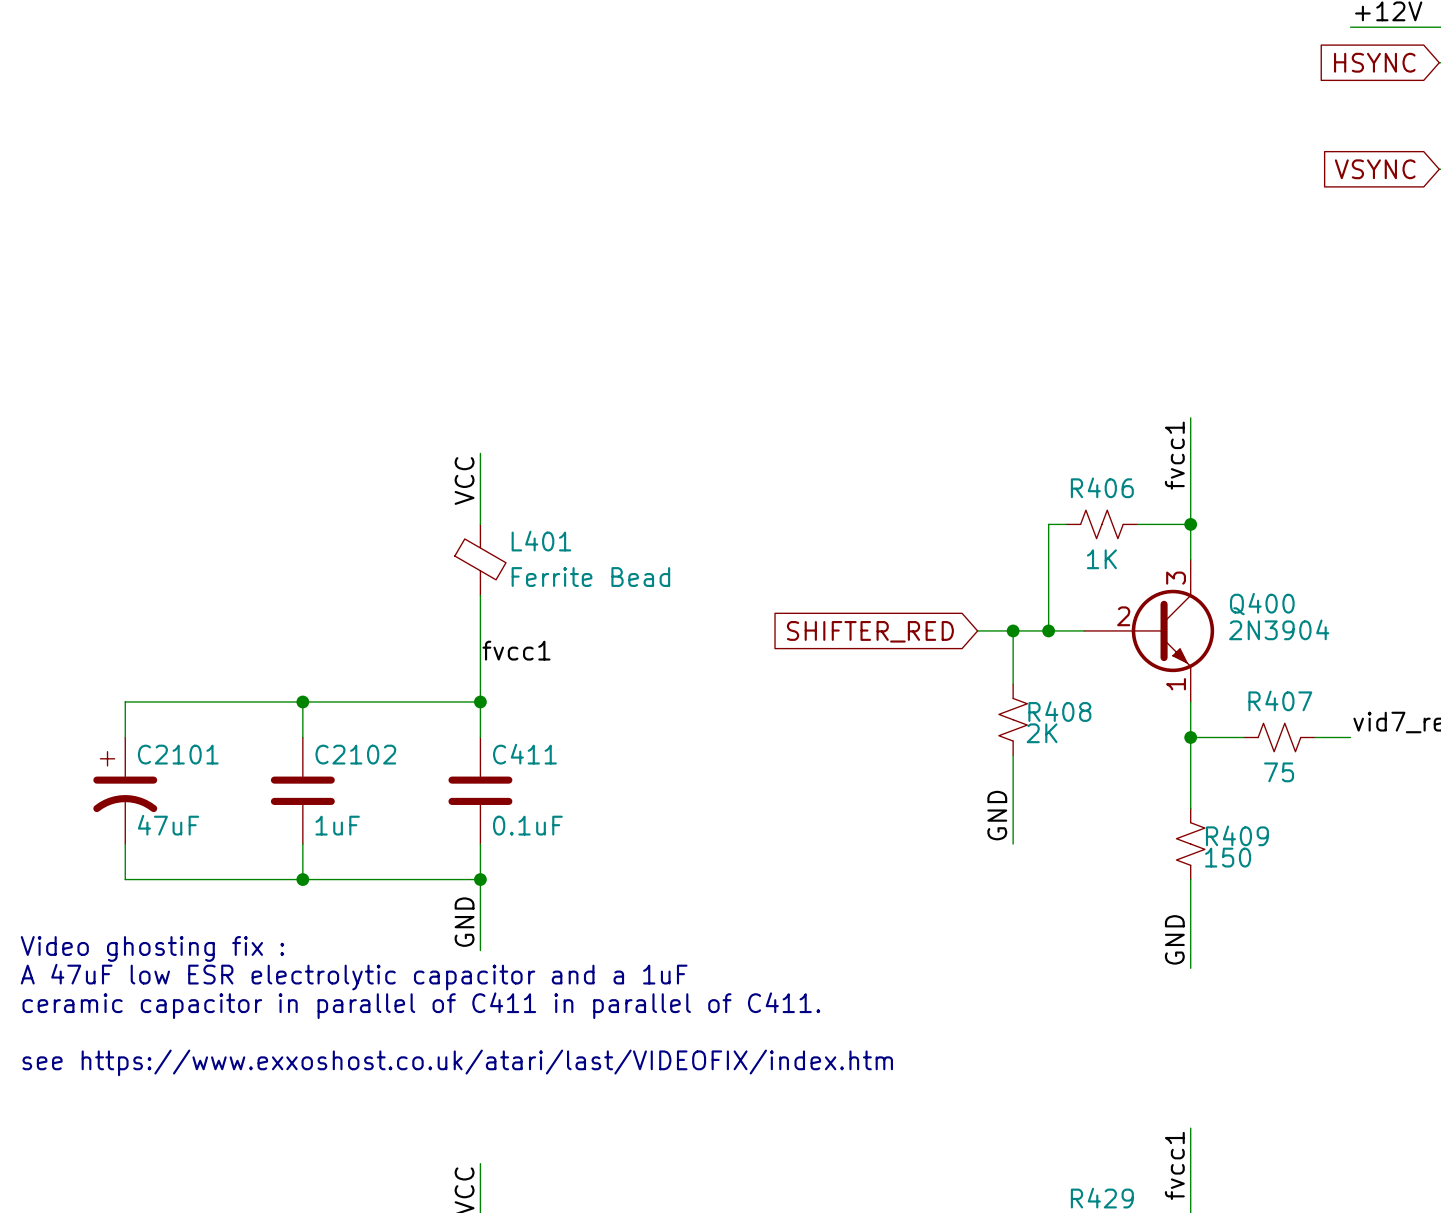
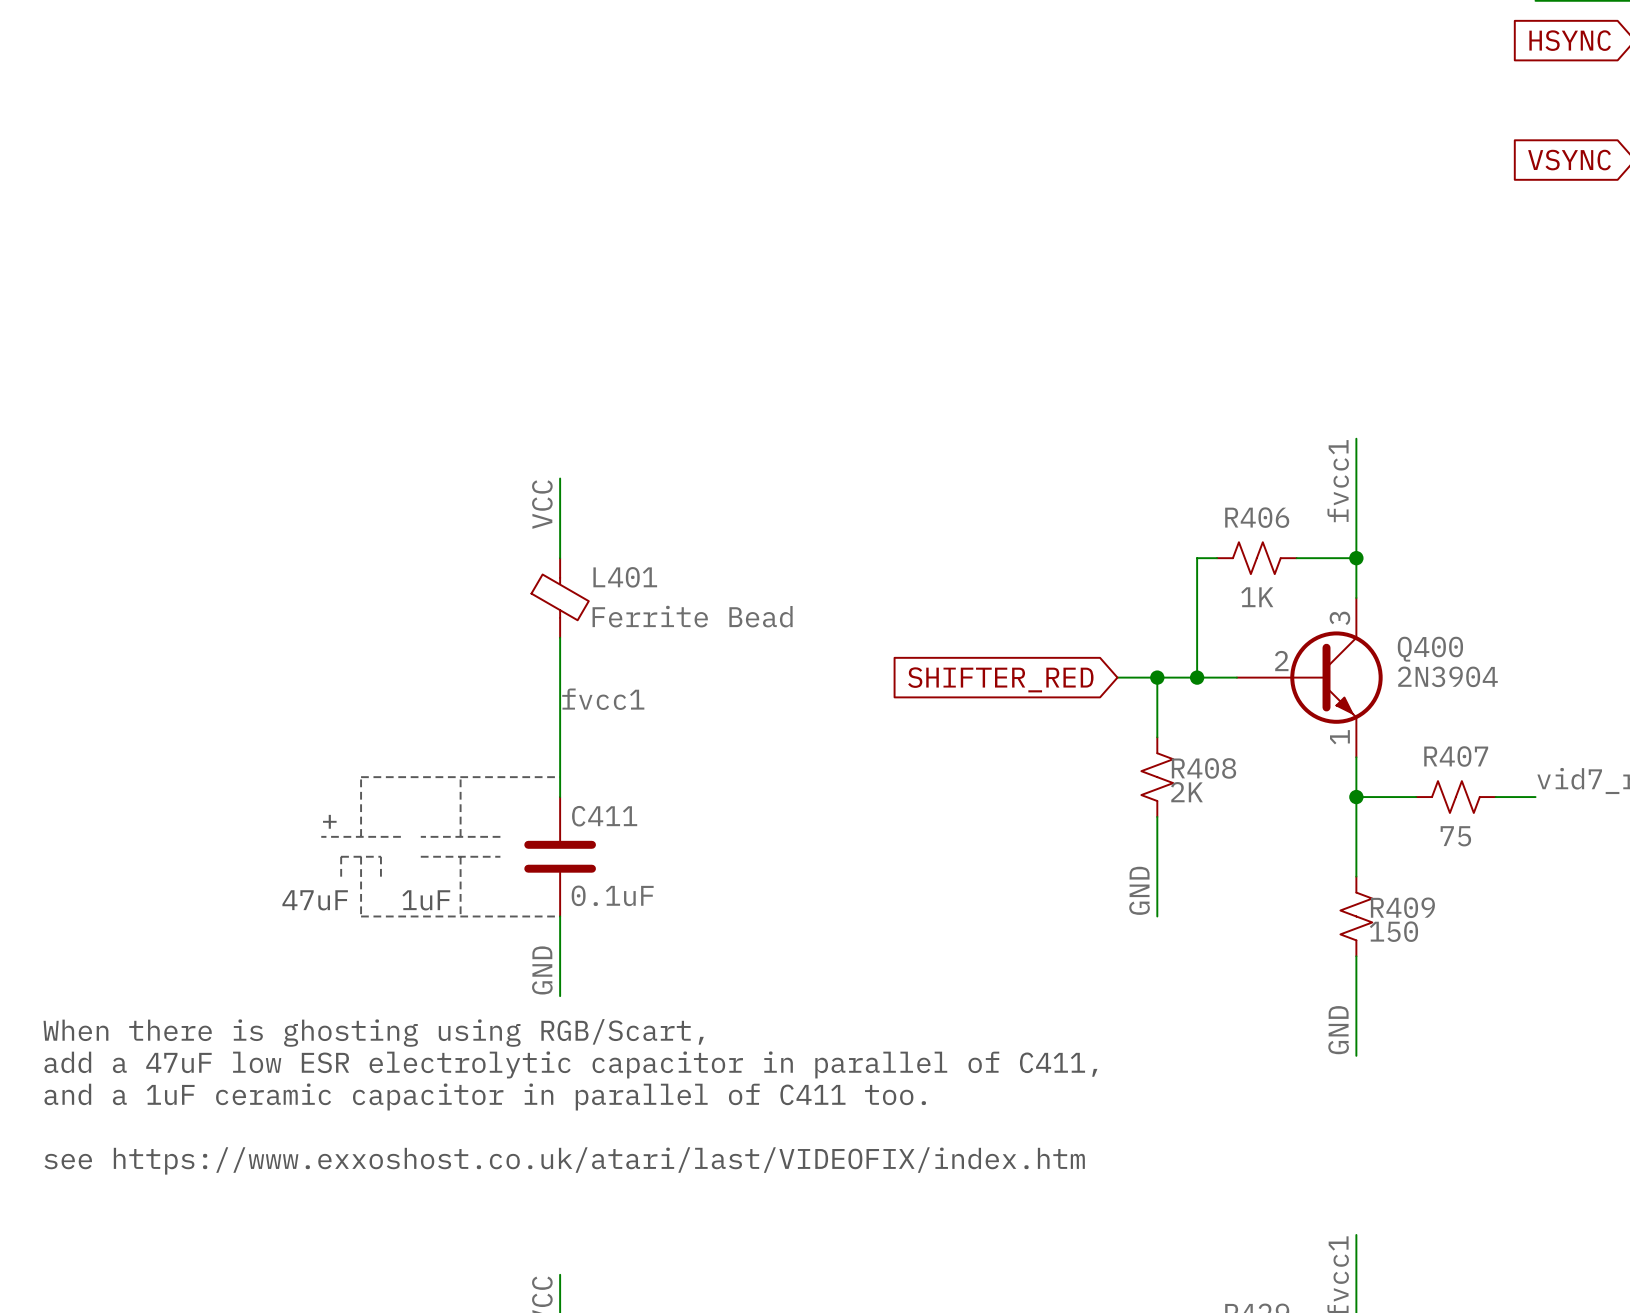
wire: (302, 701) (302, 737) -> none
junction: (302, 701) -> none
wire: (480, 701) (125, 701) (125, 737) -> none
junction: (480, 701) -> none
line: none -> (460, 777) (460, 836)
line: none -> (560, 777) (361, 777) (361, 836)
text: none -> + (329, 821)
line: none -> (321, 836) (400, 836)
line: none -> (420, 836) (500, 836)
C2101: 47uF (125, 790) -> none
line: none -> (361, 856) (361, 916) (560, 916)
C2102: 1uF (302, 790) -> none
line: none -> (420, 856) (500, 856)
line: none -> (460, 856) (460, 916)
line: none -> (341, 876) (341, 856) (380, 856) (380, 876)
text: none -> 47uF (315, 900)
text: none -> 1uF (426, 900)
wire: (125, 844) (125, 879) (480, 879) -> none
wire: (302, 844) (302, 879) -> none
junction: (302, 879) -> none
junction: (480, 879) -> none
wire: (480, 915) (480, 950) -> none
label position: GND (464, 922) -> GND (542, 970)
text: Video ghosting fix : (152, 948) -> When there is ghosting using RGB/Scart, (373, 1032)
text: A 47uF low ESR electrolytic capacitor and a 1uF (354, 977) -> add a 47uF low ESR electrolytic capacitor in parallel of C411, (570, 1064)
text: ceramic capacitor in parallel of C411 in parallel of C411. (421, 1005) -> and a 1uF ceramic capacitor in parallel of C411 too. (485, 1097)

